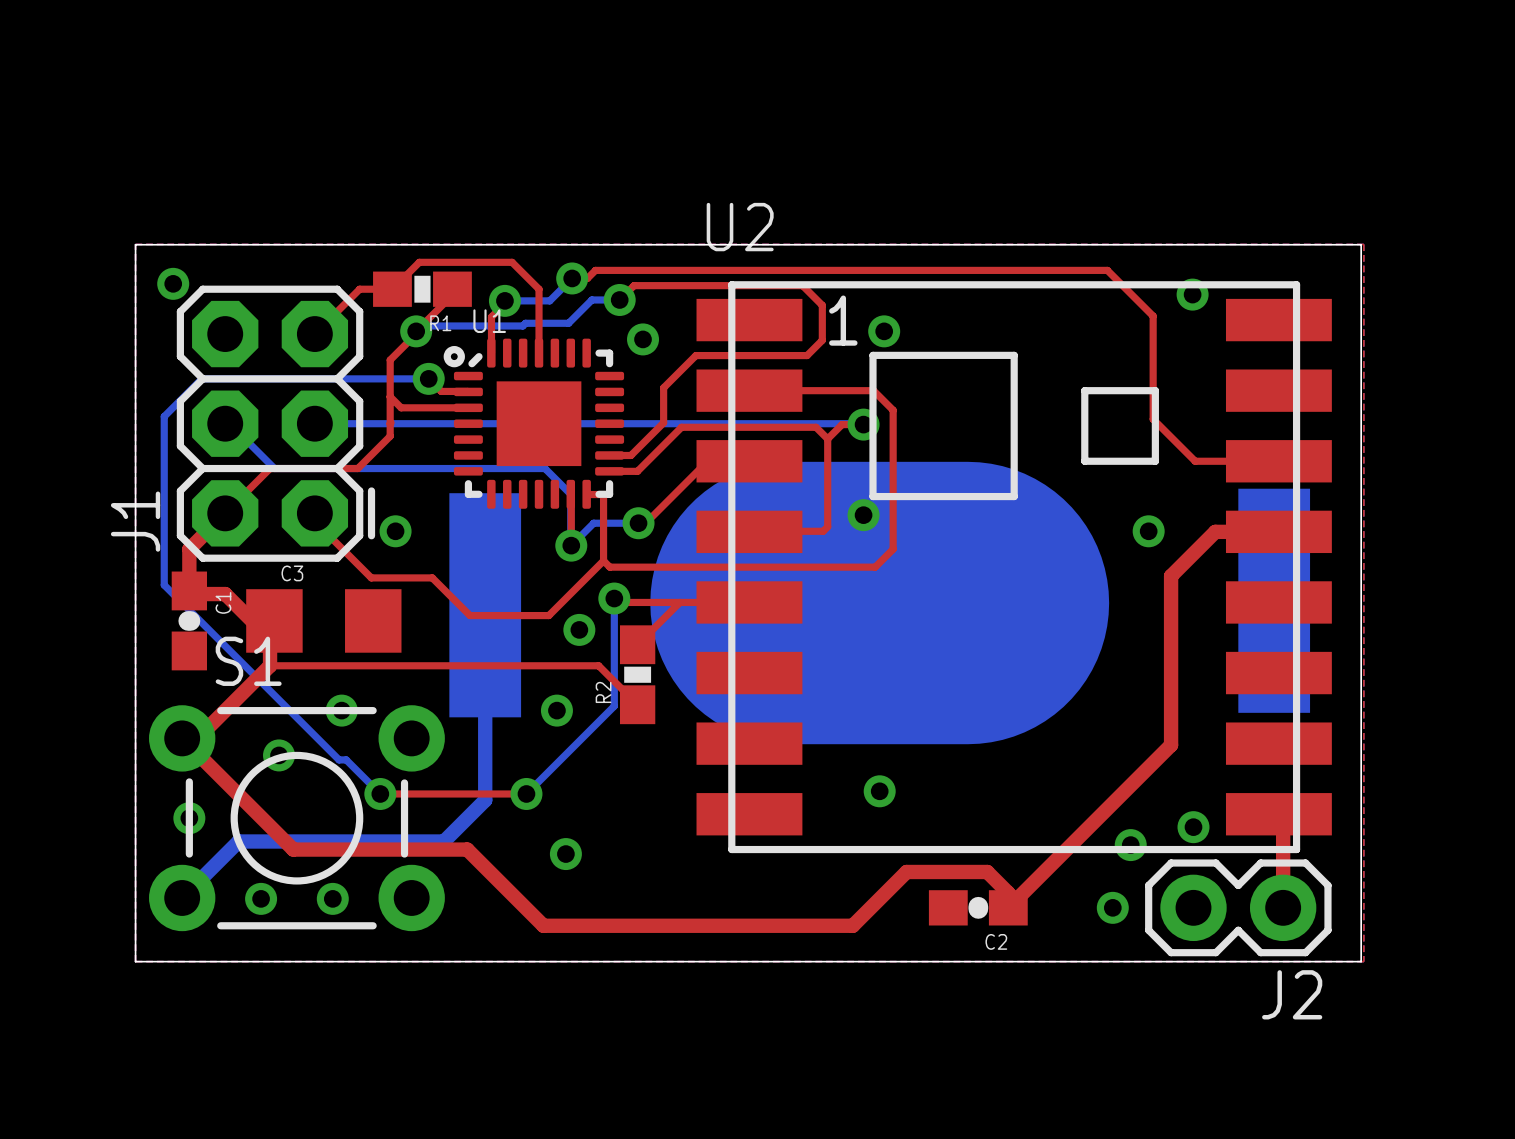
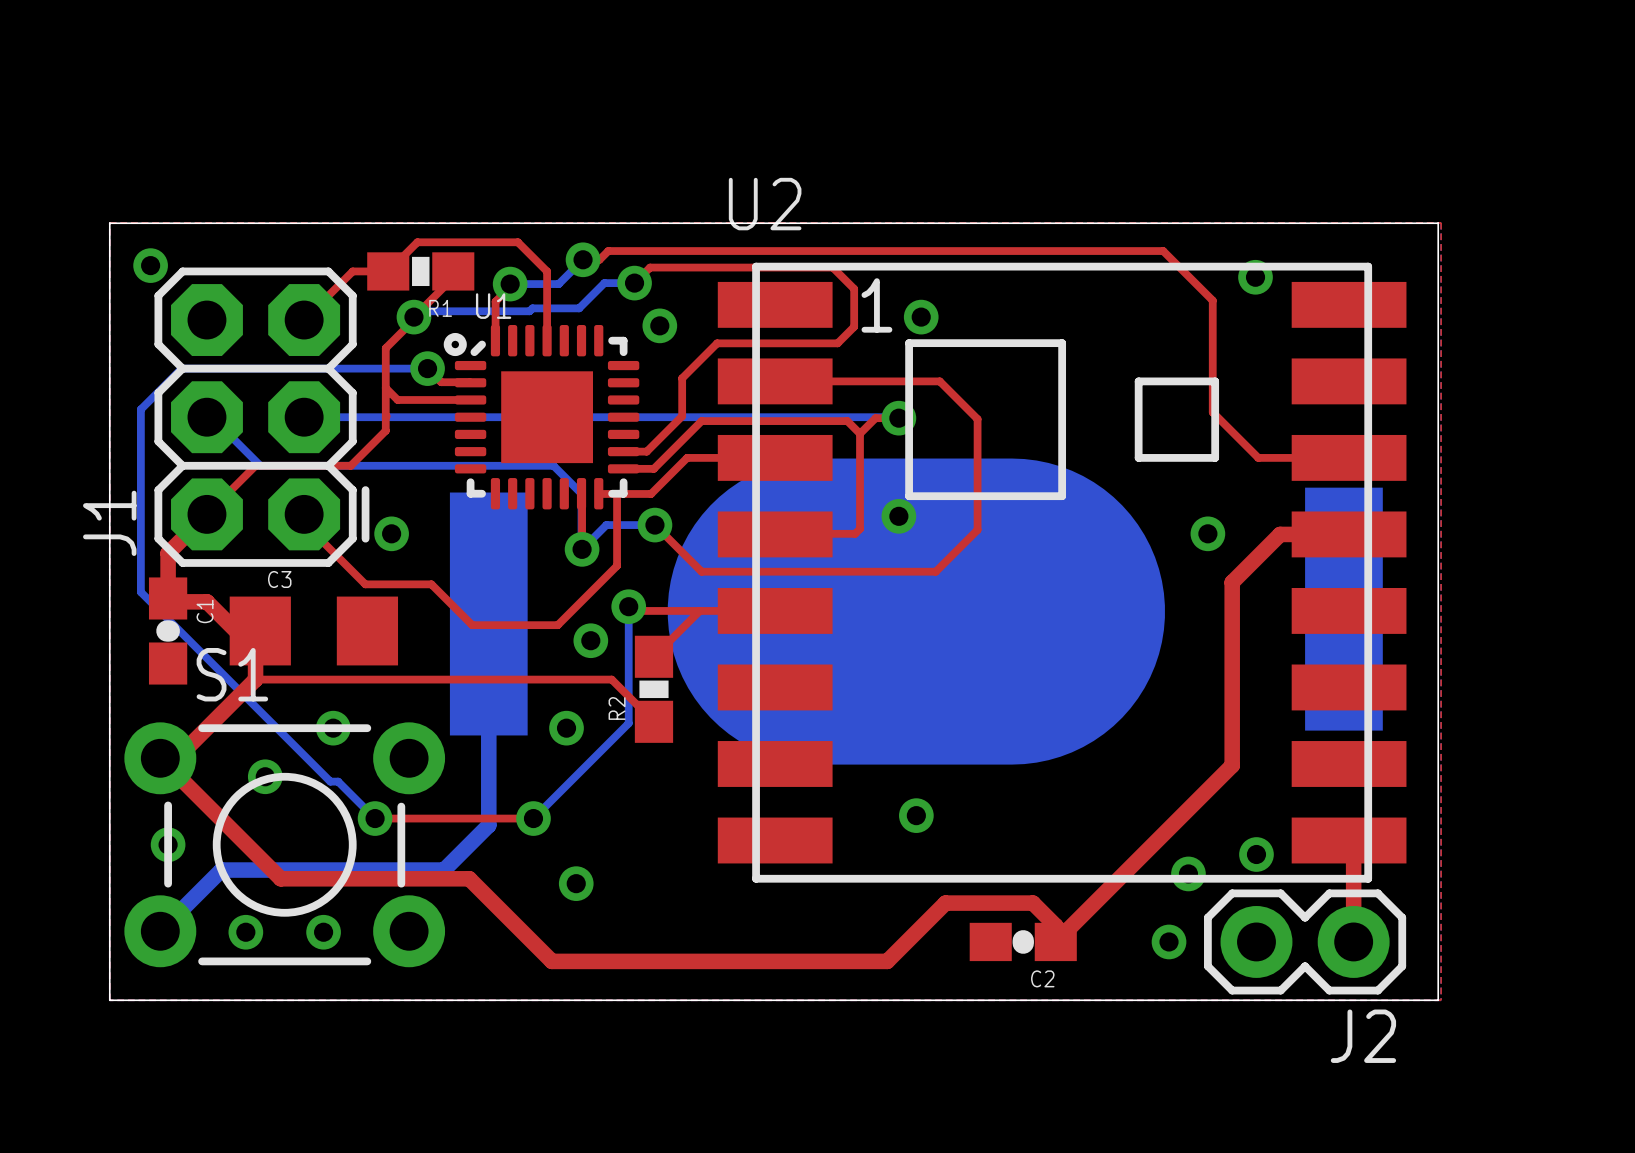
top track: (873, 390) (893, 410) (893, 549) (875, 567) (609, 567) (603, 560) -> (909, 381) (939, 381) (977, 419) (977, 529) (935, 571) (701, 571) (654, 525)
top track: (749, 461) (747, 459) (709, 459) (645, 523) (638, 523) -> (775, 457) (687, 457) (651, 493) (618, 493)

